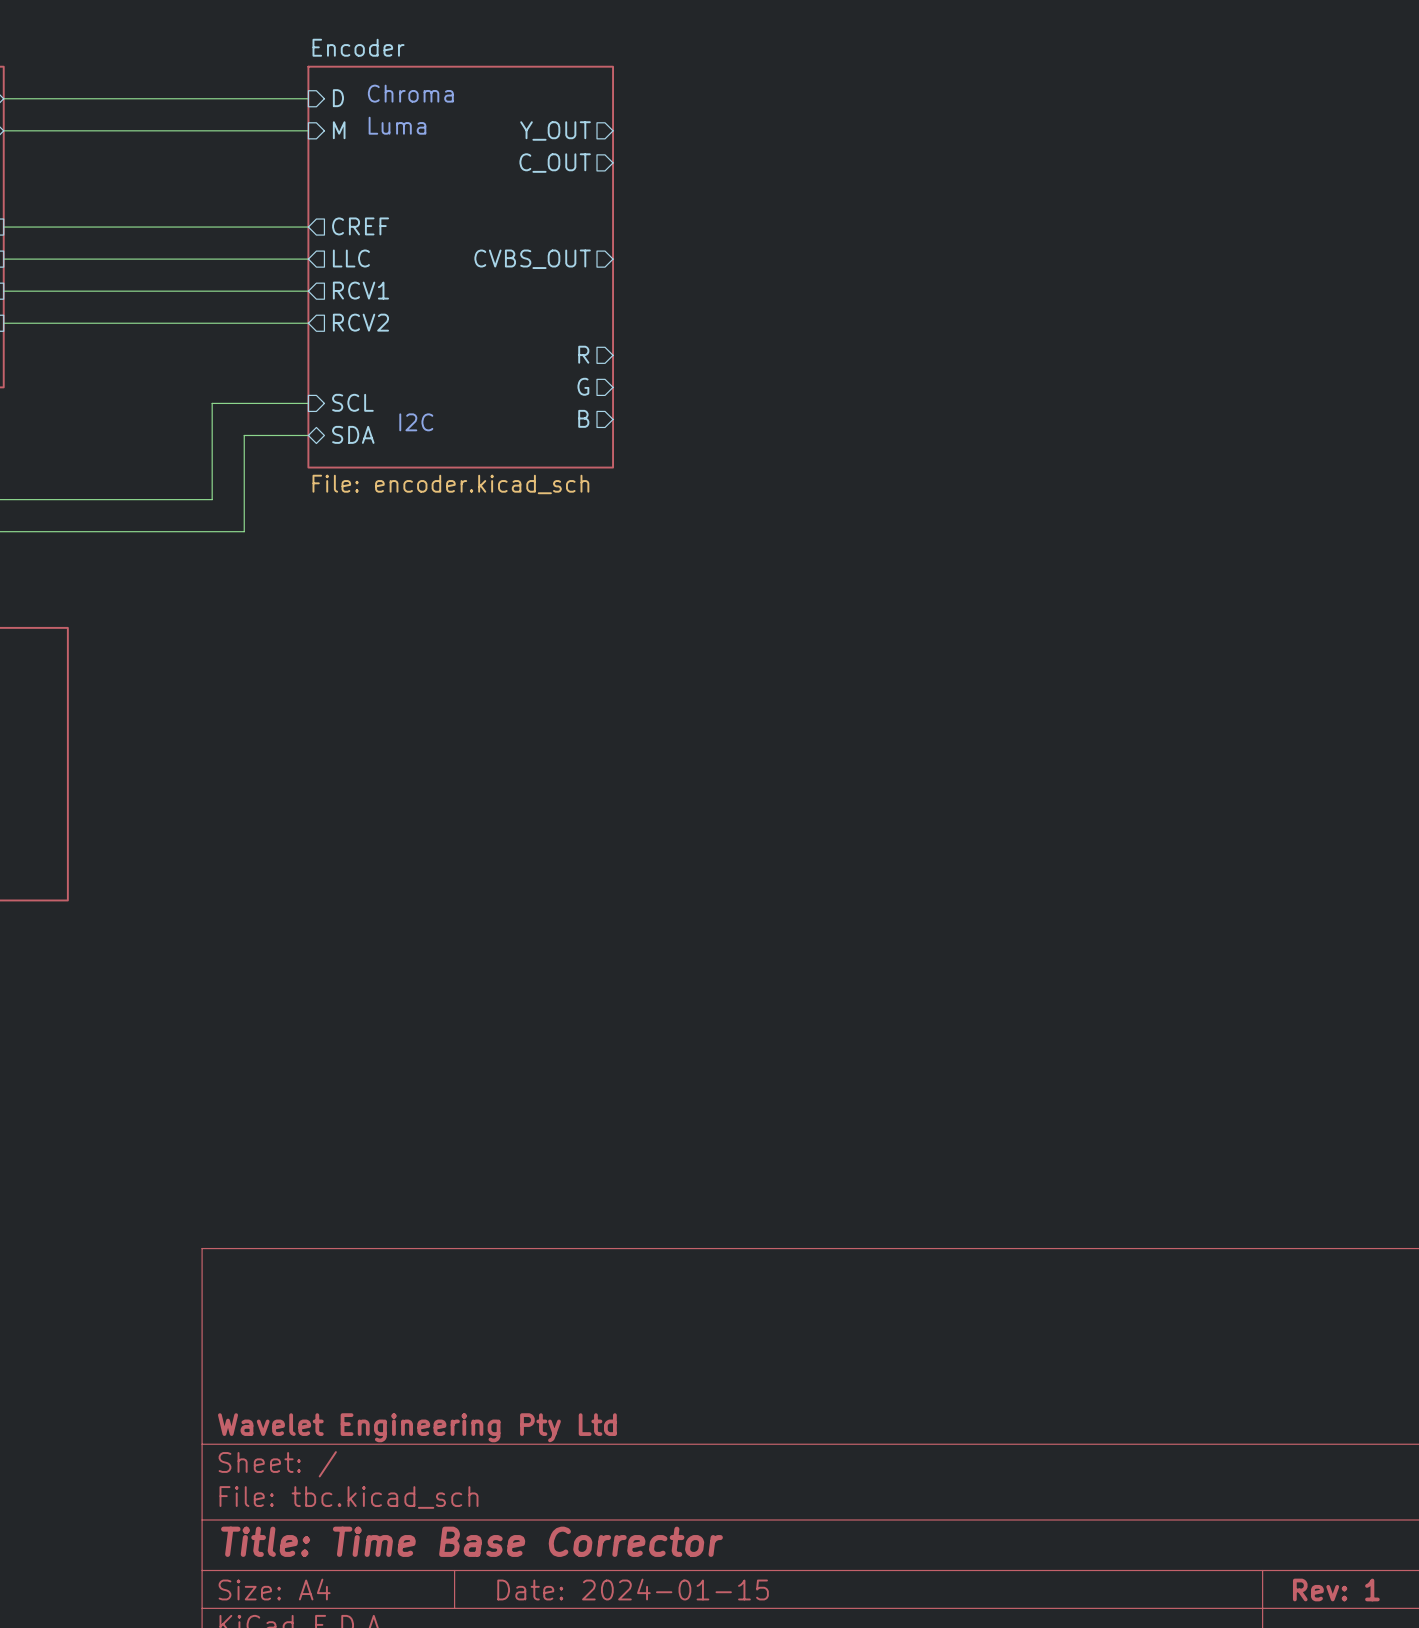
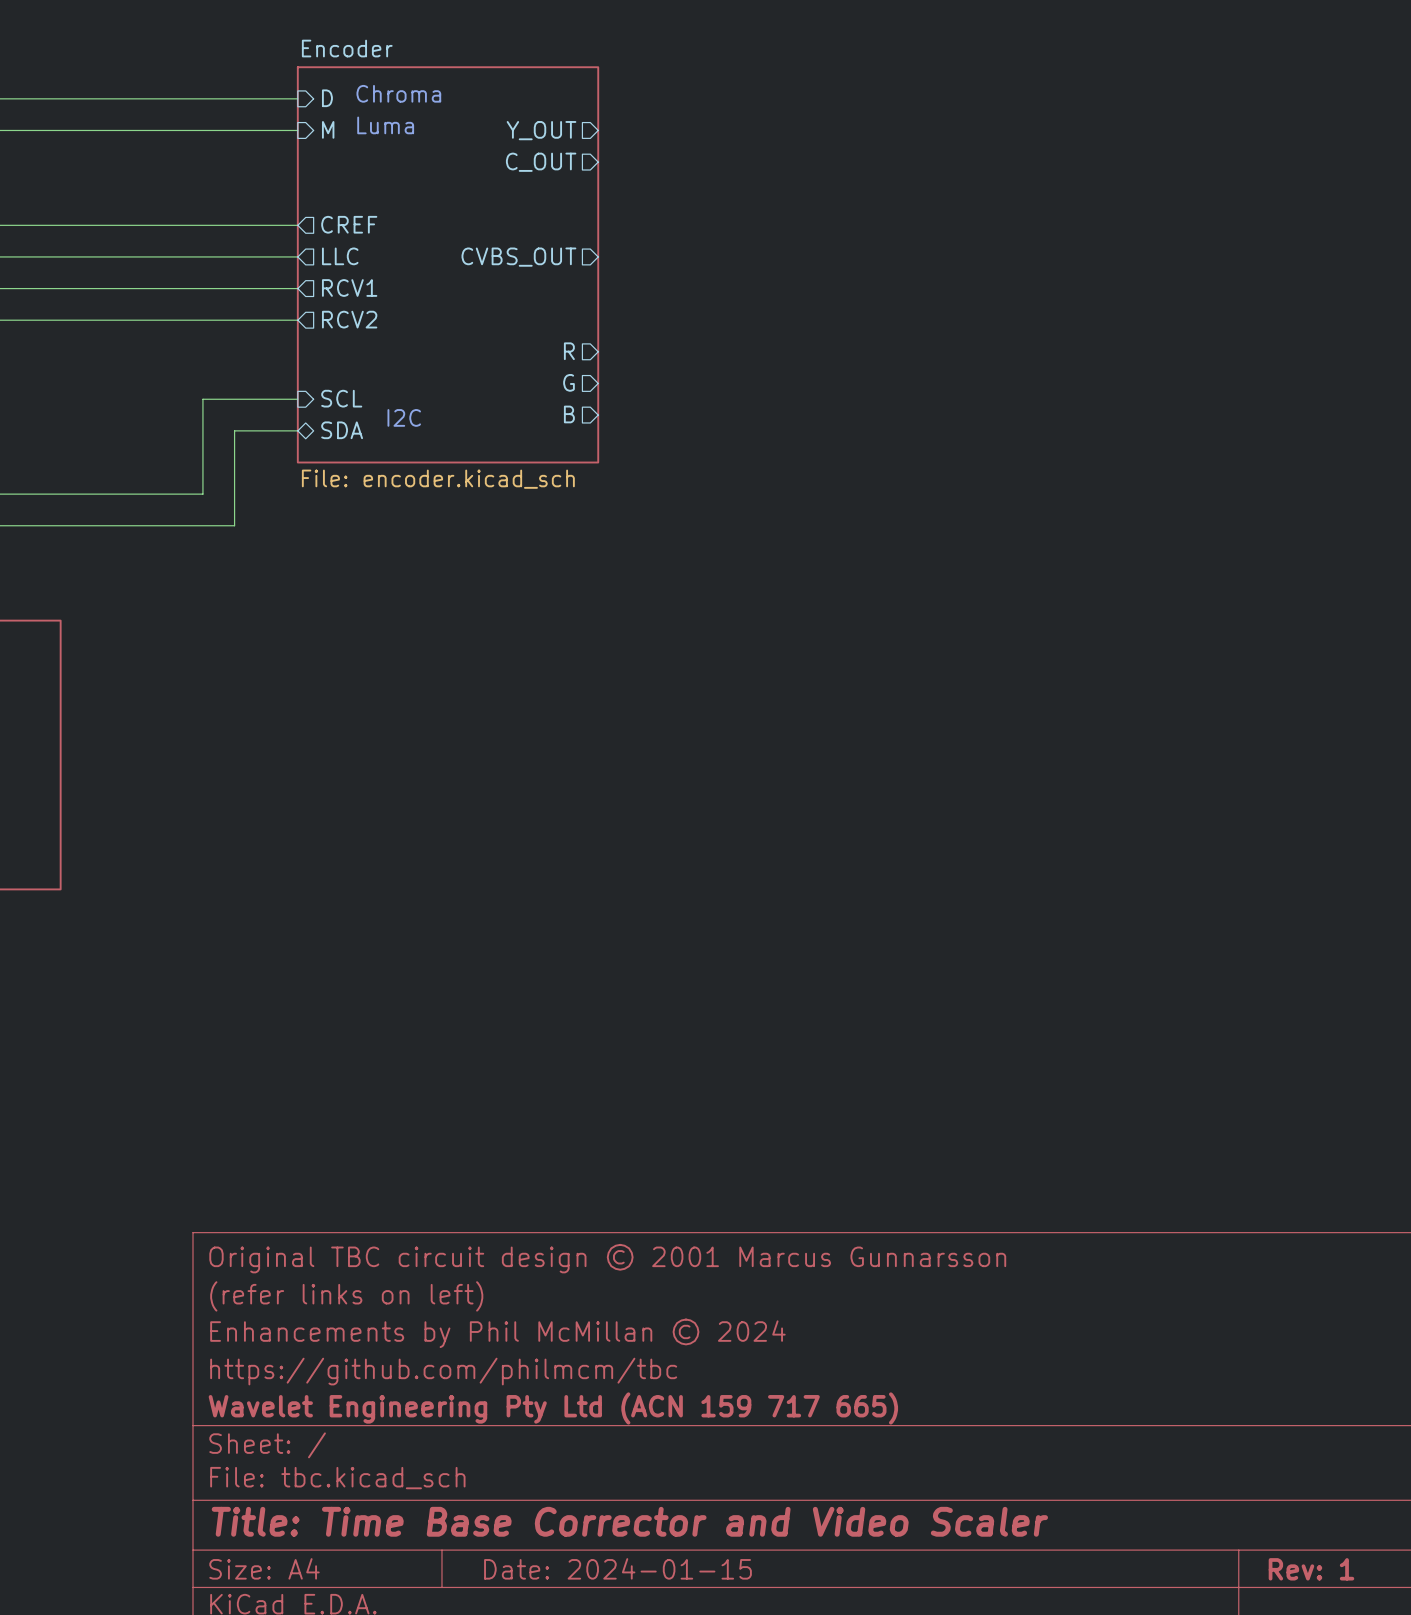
title block: none -> Original TBC circuit design © 2001 Marcus Gunnarsson (607, 1258)
title block: none -> (refer links on left) (346, 1296)
title block: none -> Enhancements by Phil McMillan © 2024 (497, 1333)
title block: none -> https://github.com/philmcm/tbc (443, 1371)
title block: Wavelet Engineering Pty Ltd (417, 1427) -> Wavelet Engineering Pty Ltd (ACN 159 717 665) (553, 1408)
title block: Title: Time Base Corrector (471, 1541) -> Title: Time Base Corrector and Video Scaler (629, 1521)

